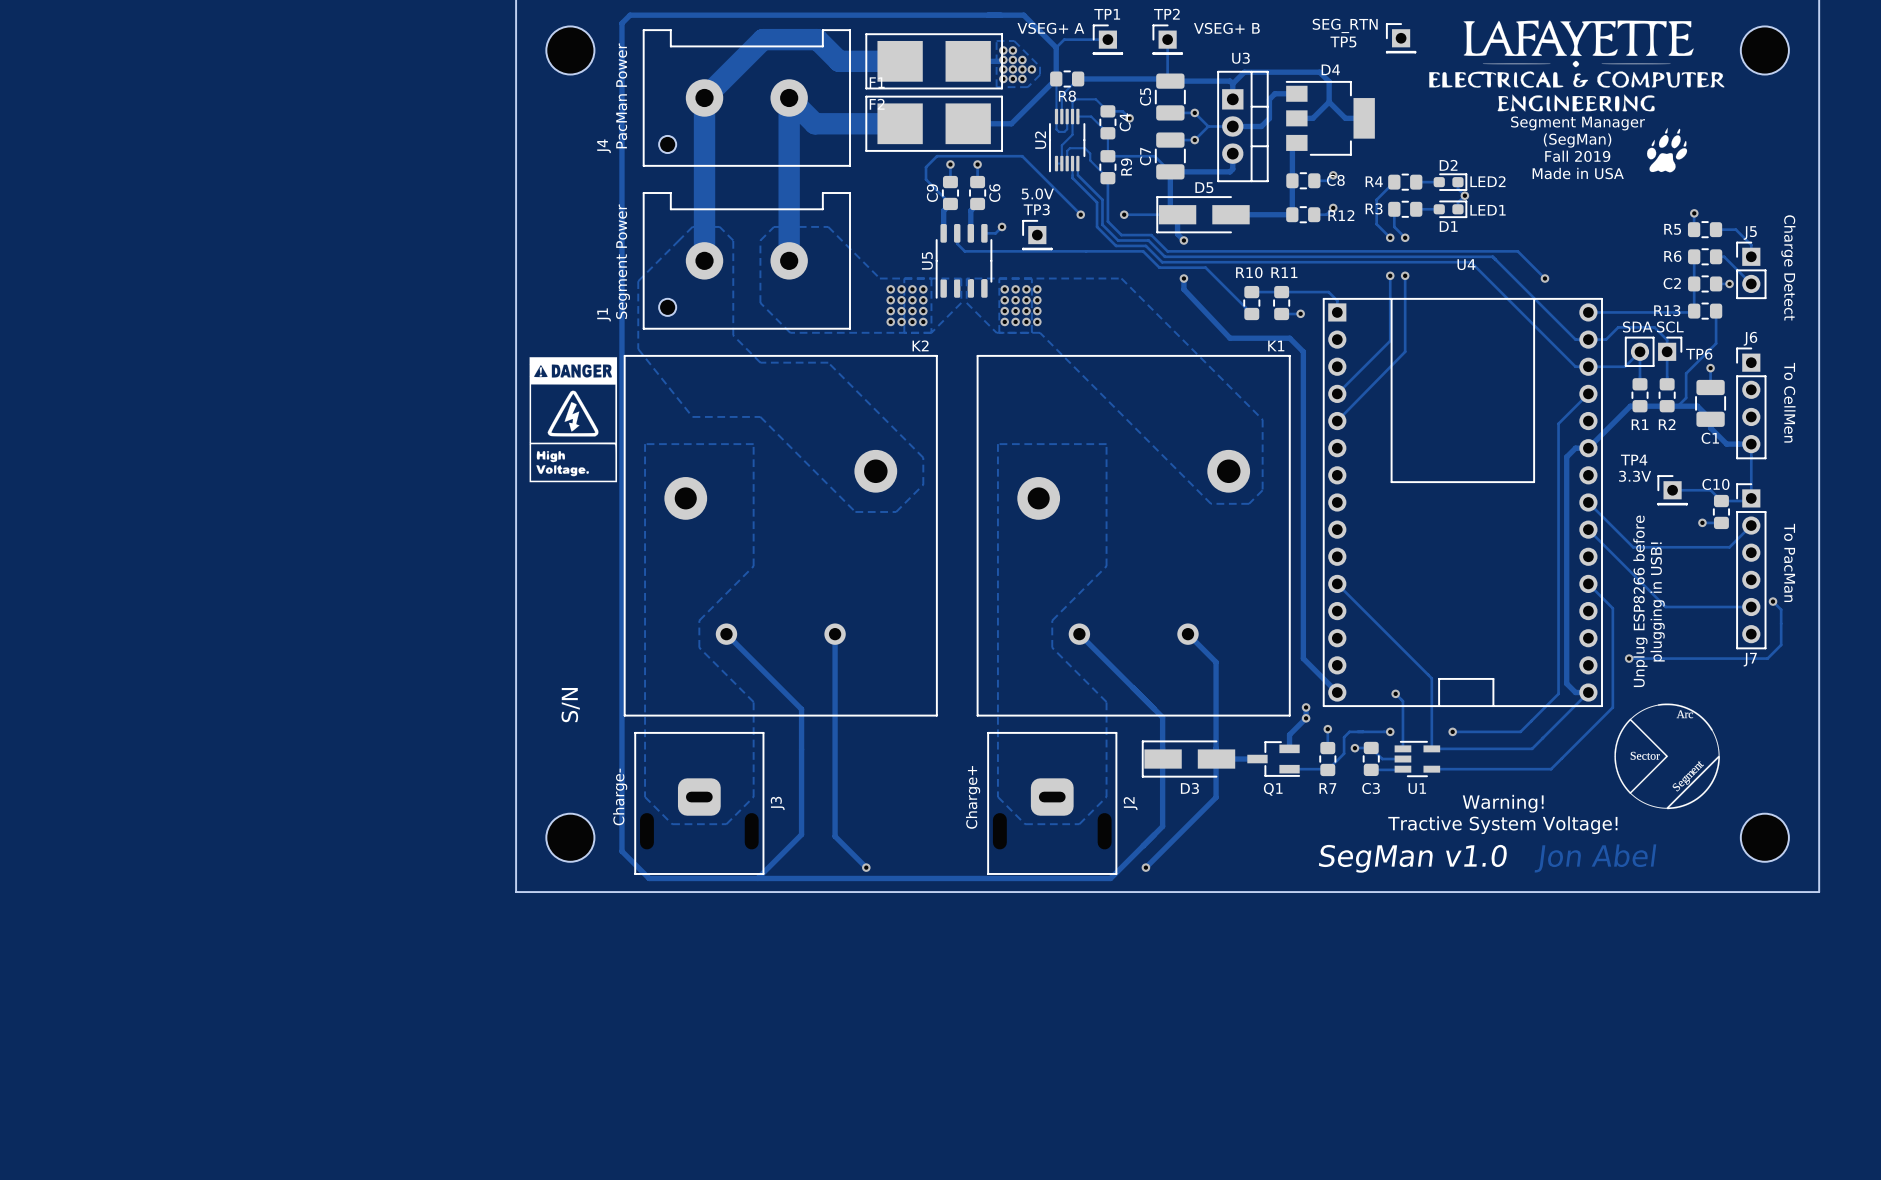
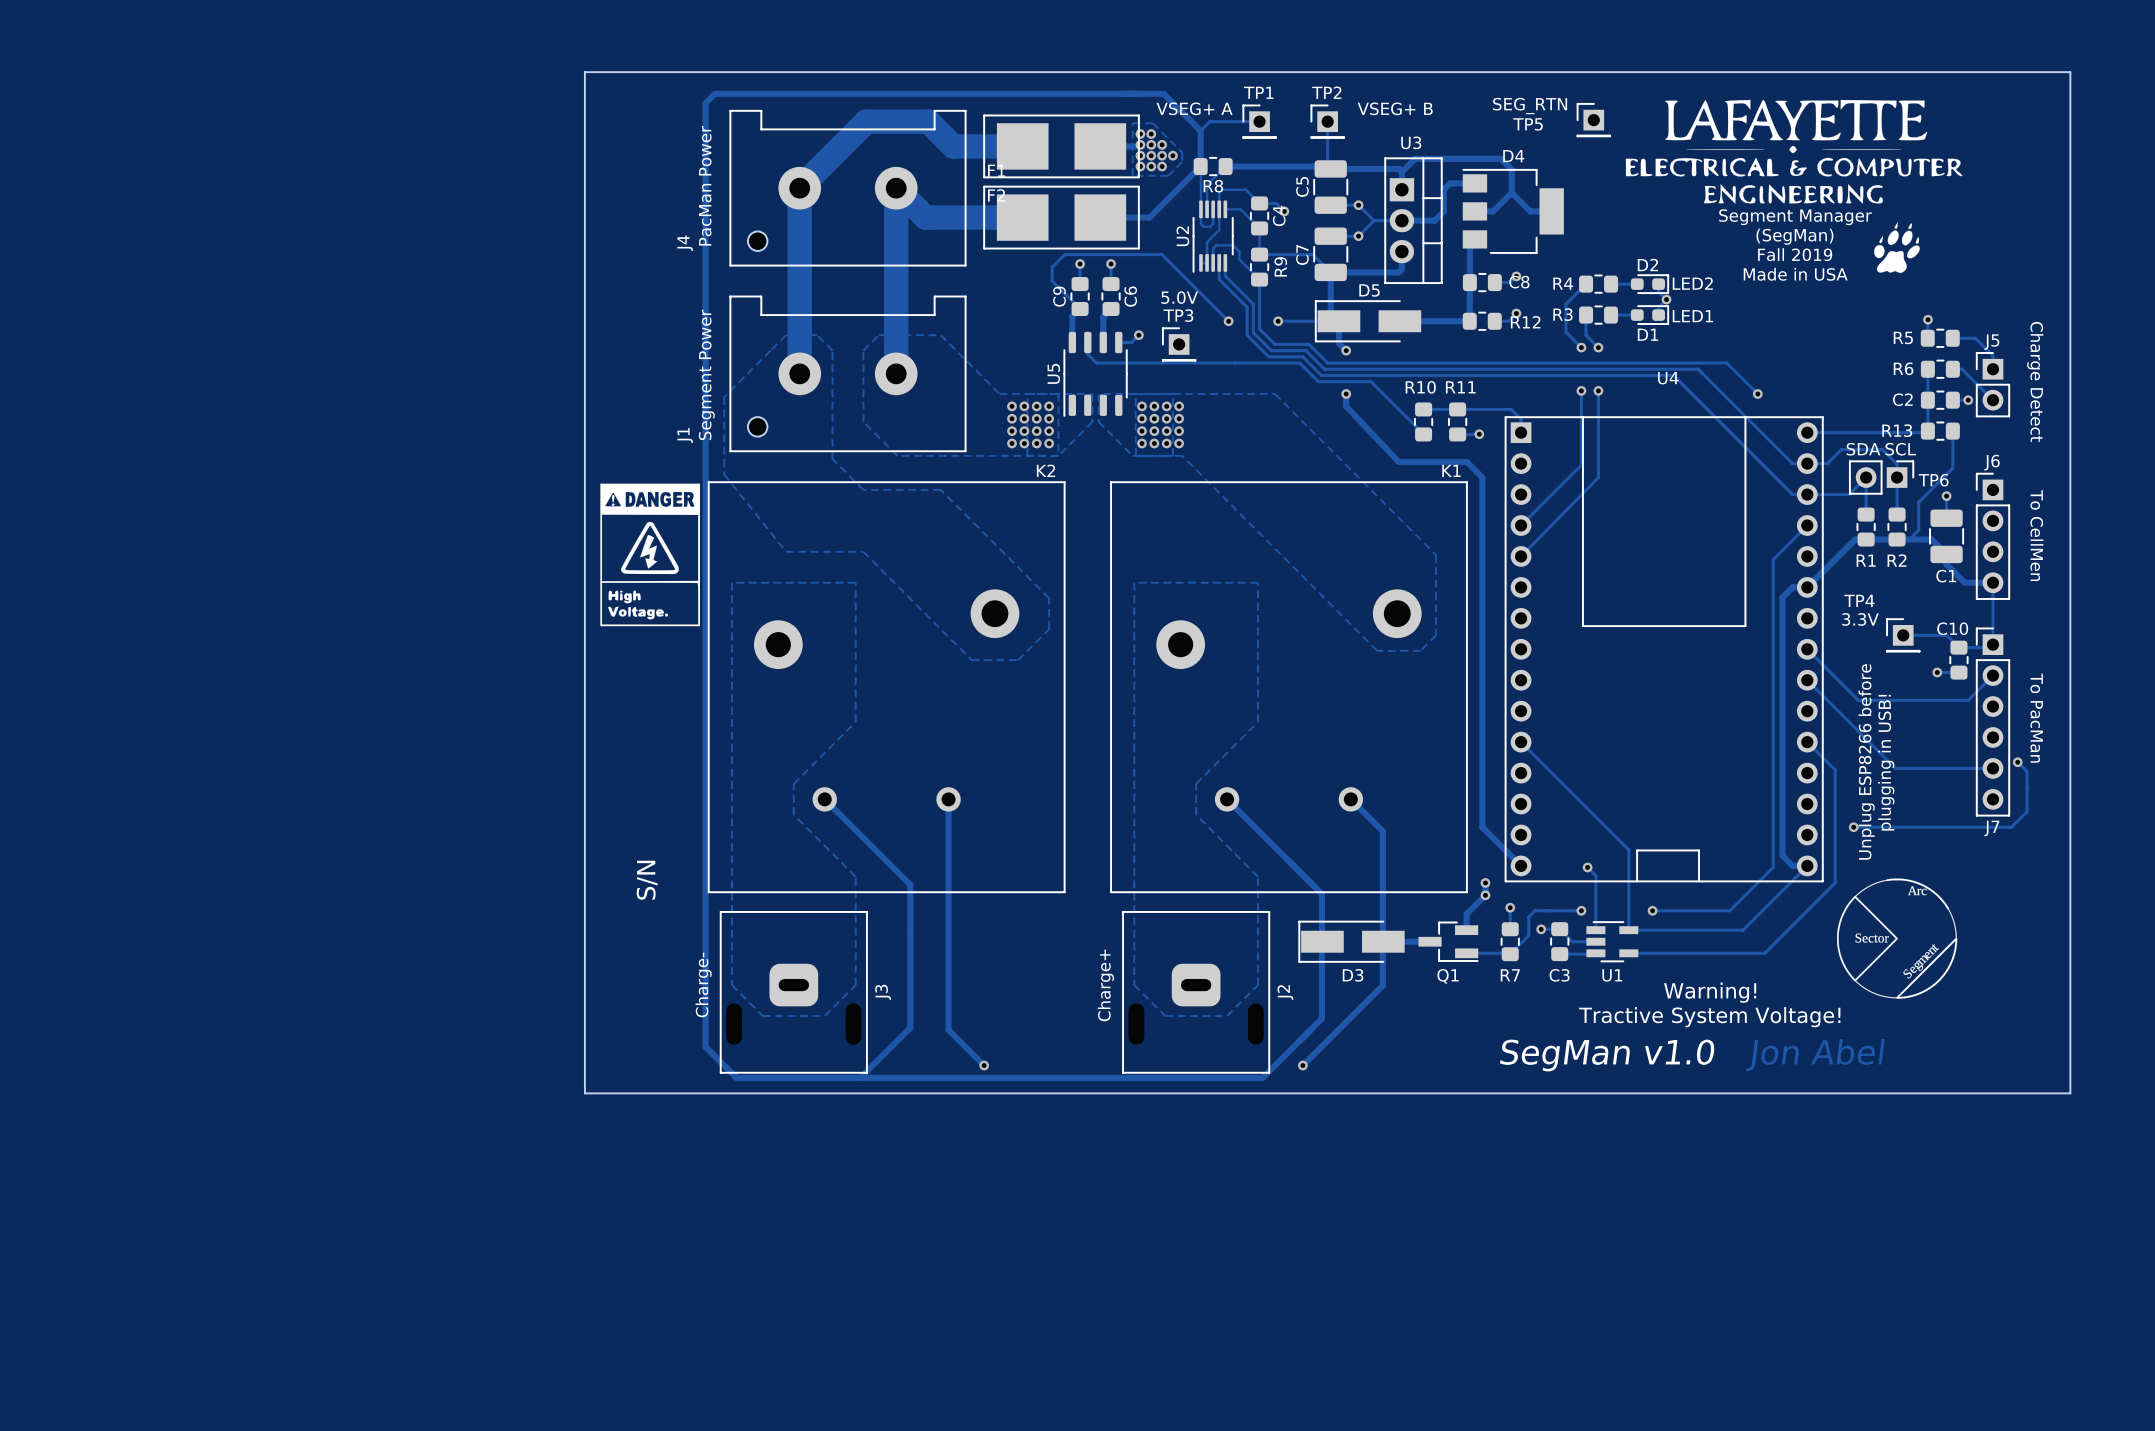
part: (570, 50) -> none
part: (1764, 50) -> none
part: (570, 837) -> none
part: (1764, 837) -> none

